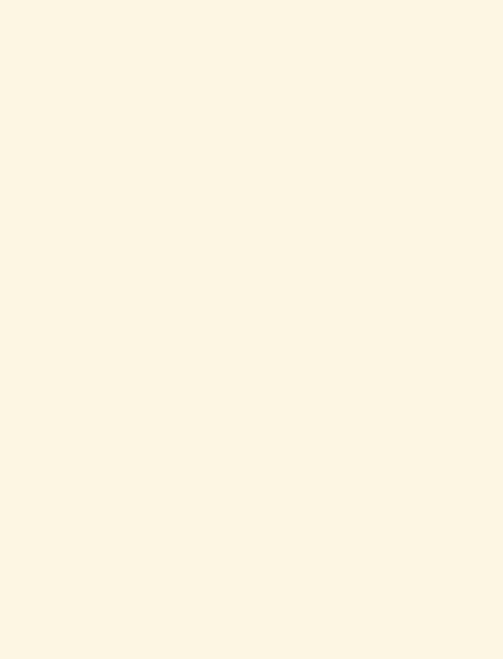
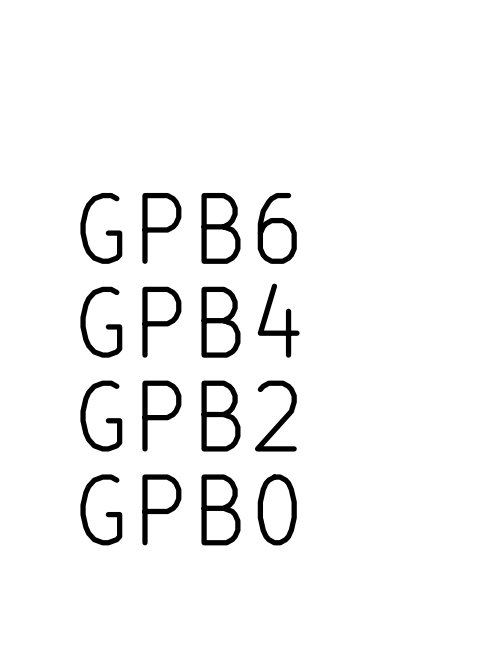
label: none -> GPB6 (188, 228)
label: none -> GPB4 (190, 320)
label: none -> GPB2 (188, 416)
label: none -> GPB0 (188, 509)

